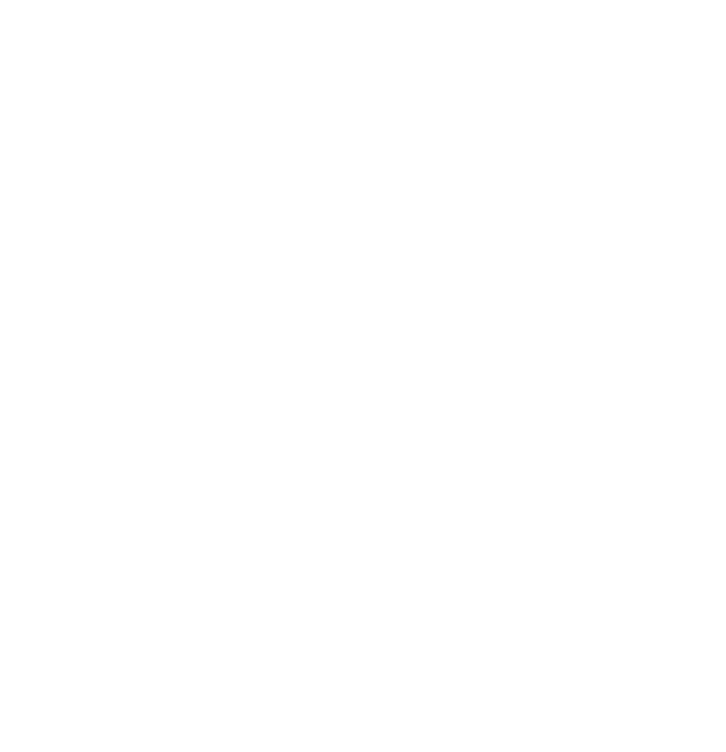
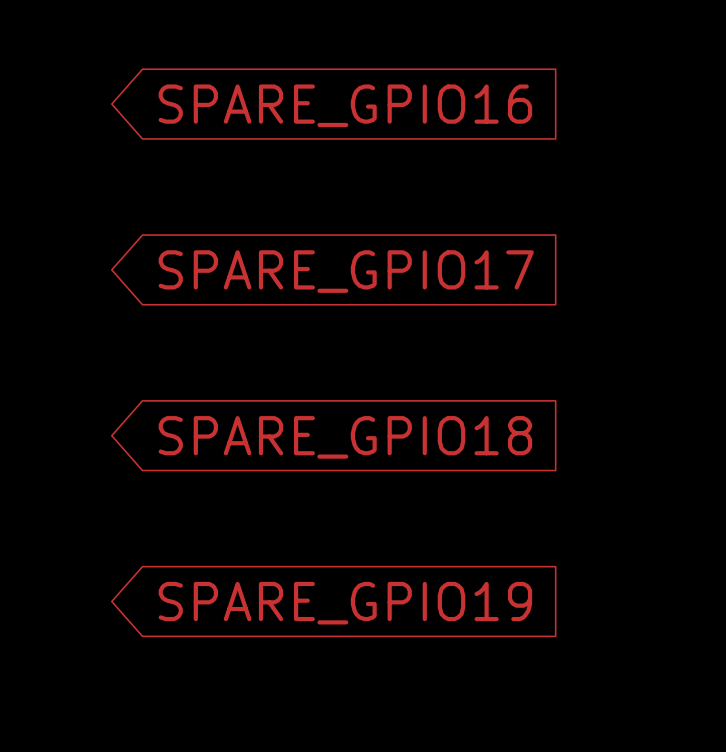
global label: none -> SPARE_GPIO16 (345, 105)
global label: none -> SPARE_GPIO17 (346, 271)
global label: none -> SPARE_GPIO18 (345, 437)
global label: none -> SPARE_GPIO19 (345, 603)

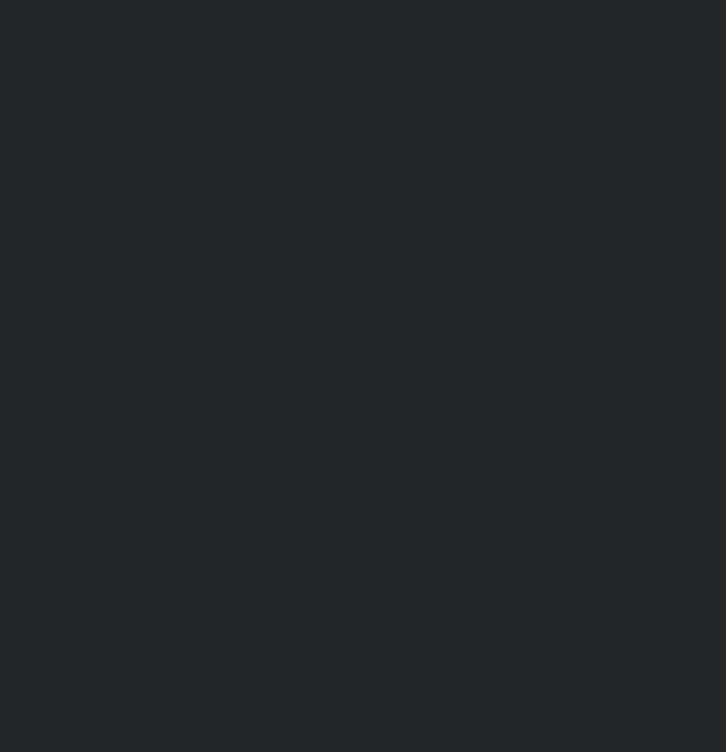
global label: SPARE_GPIO16 (345, 105) -> none
global label: SPARE_GPIO17 (346, 271) -> none
global label: SPARE_GPIO18 (345, 437) -> none
global label: SPARE_GPIO19 (345, 603) -> none

